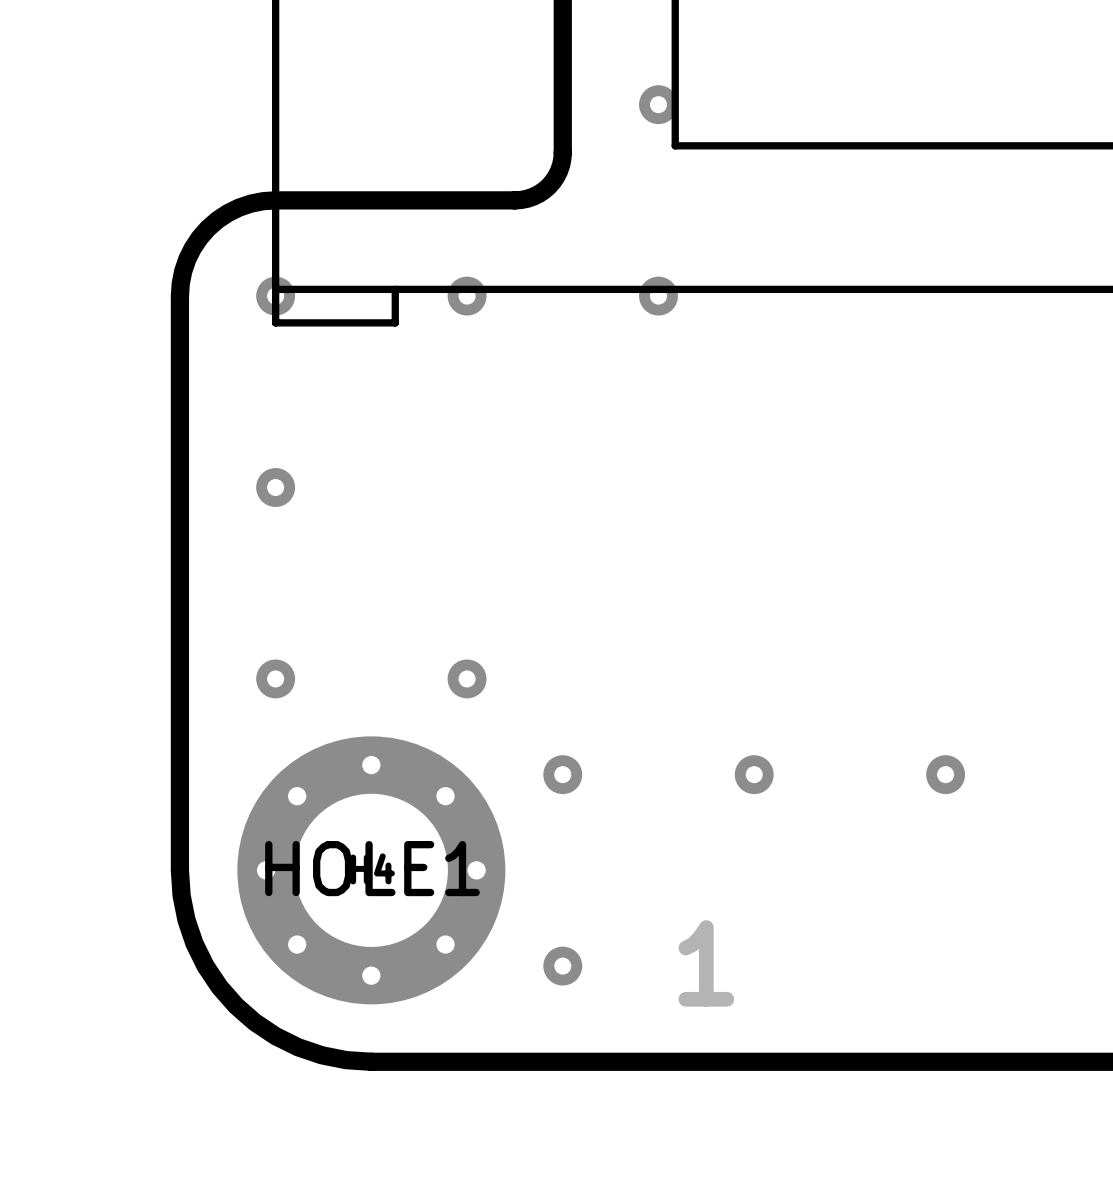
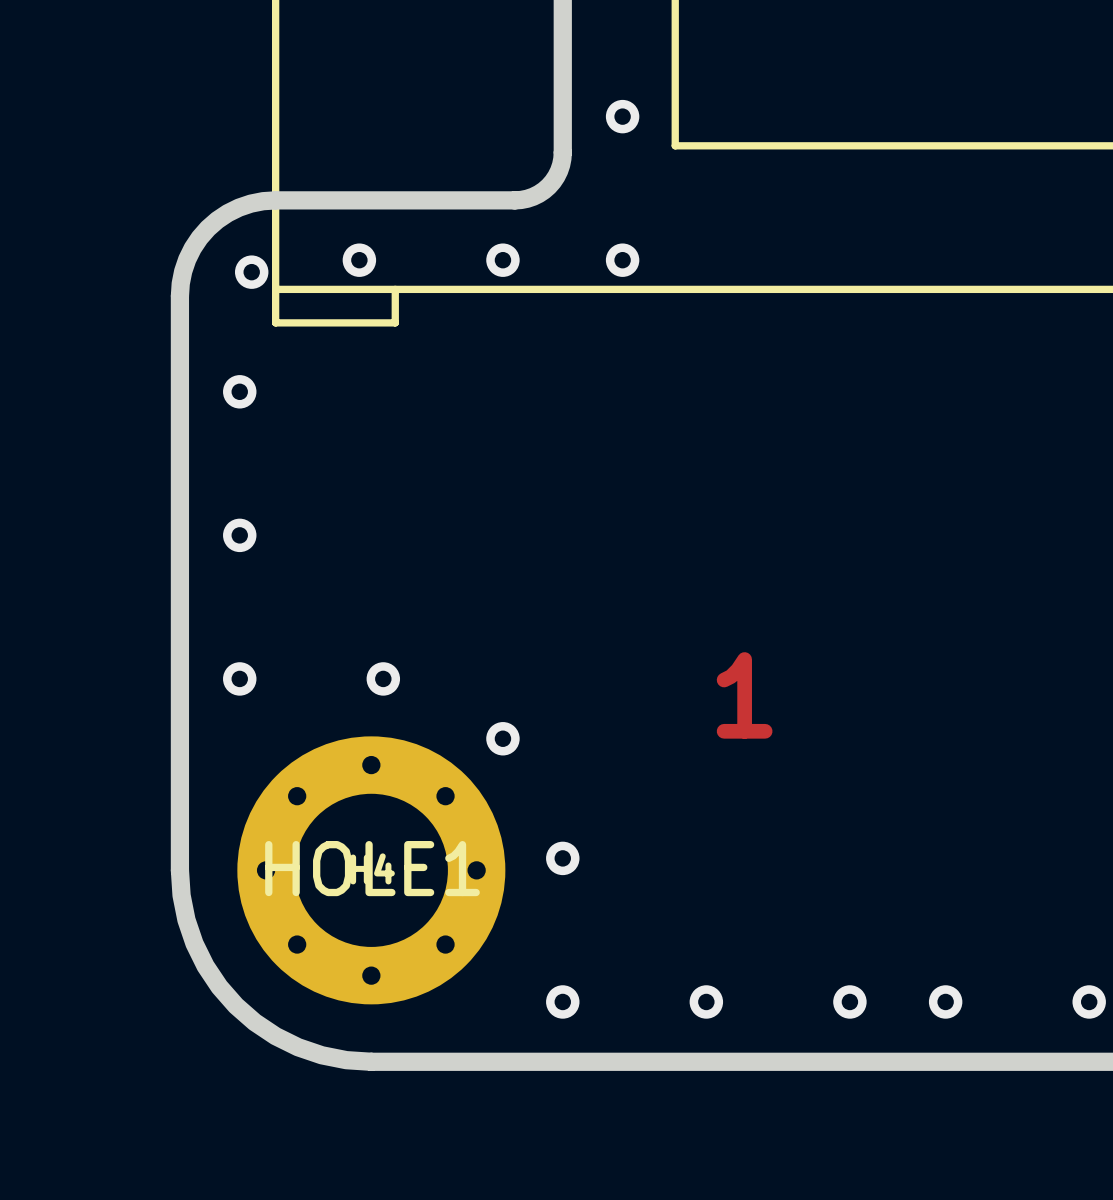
via position: (658, 104) -> (622, 116)
via: none -> (359, 260)
via: none -> (502, 260)
via: none -> (622, 260)
via position: (275, 296) -> (251, 272)
via: (467, 296) -> none
via: (658, 296) -> none
via: none -> (239, 391)
via: (275, 487) -> none
via: none -> (239, 535)
via position: (275, 678) -> (239, 678)
via: none -> (383, 678)
via: (467, 678) -> none
via: none -> (502, 738)
via: (562, 774) -> none
via: (754, 774) -> none
via: (945, 774) -> none
via: none -> (562, 858)
text position: 1 (706, 963) -> 1 (744, 695)
via position: (562, 966) -> (562, 1001)
via: none -> (706, 1001)
via: none -> (849, 1001)
via: none -> (945, 1001)
via: none -> (1089, 1001)

